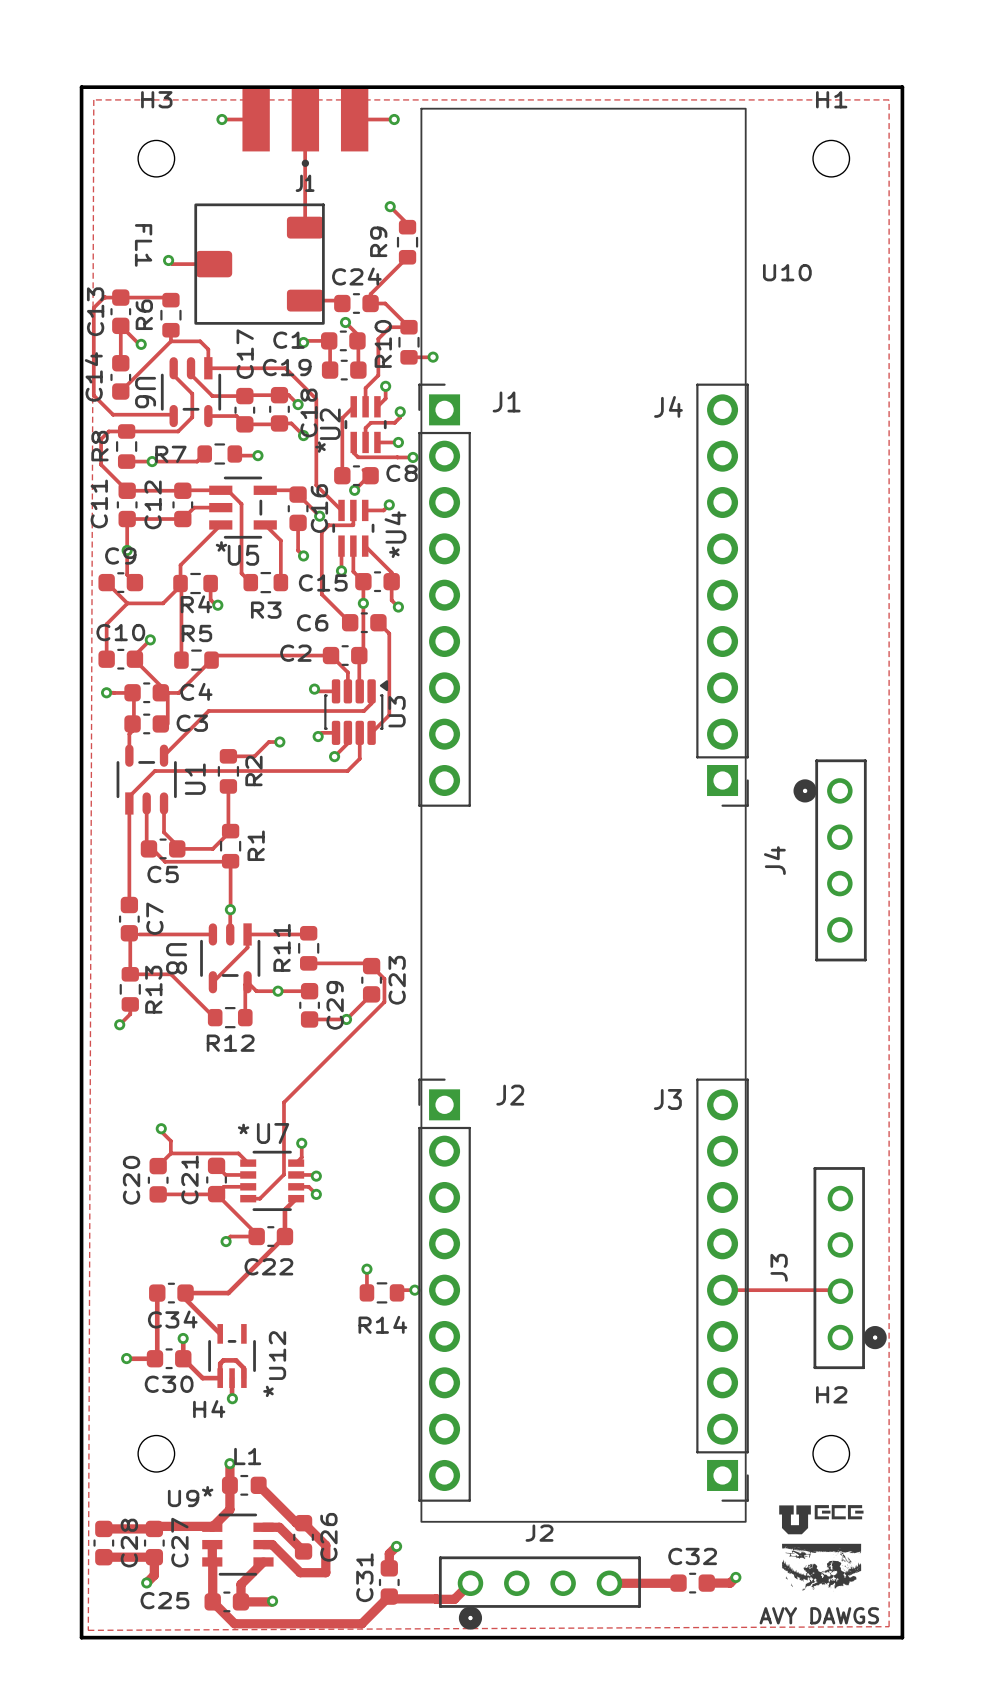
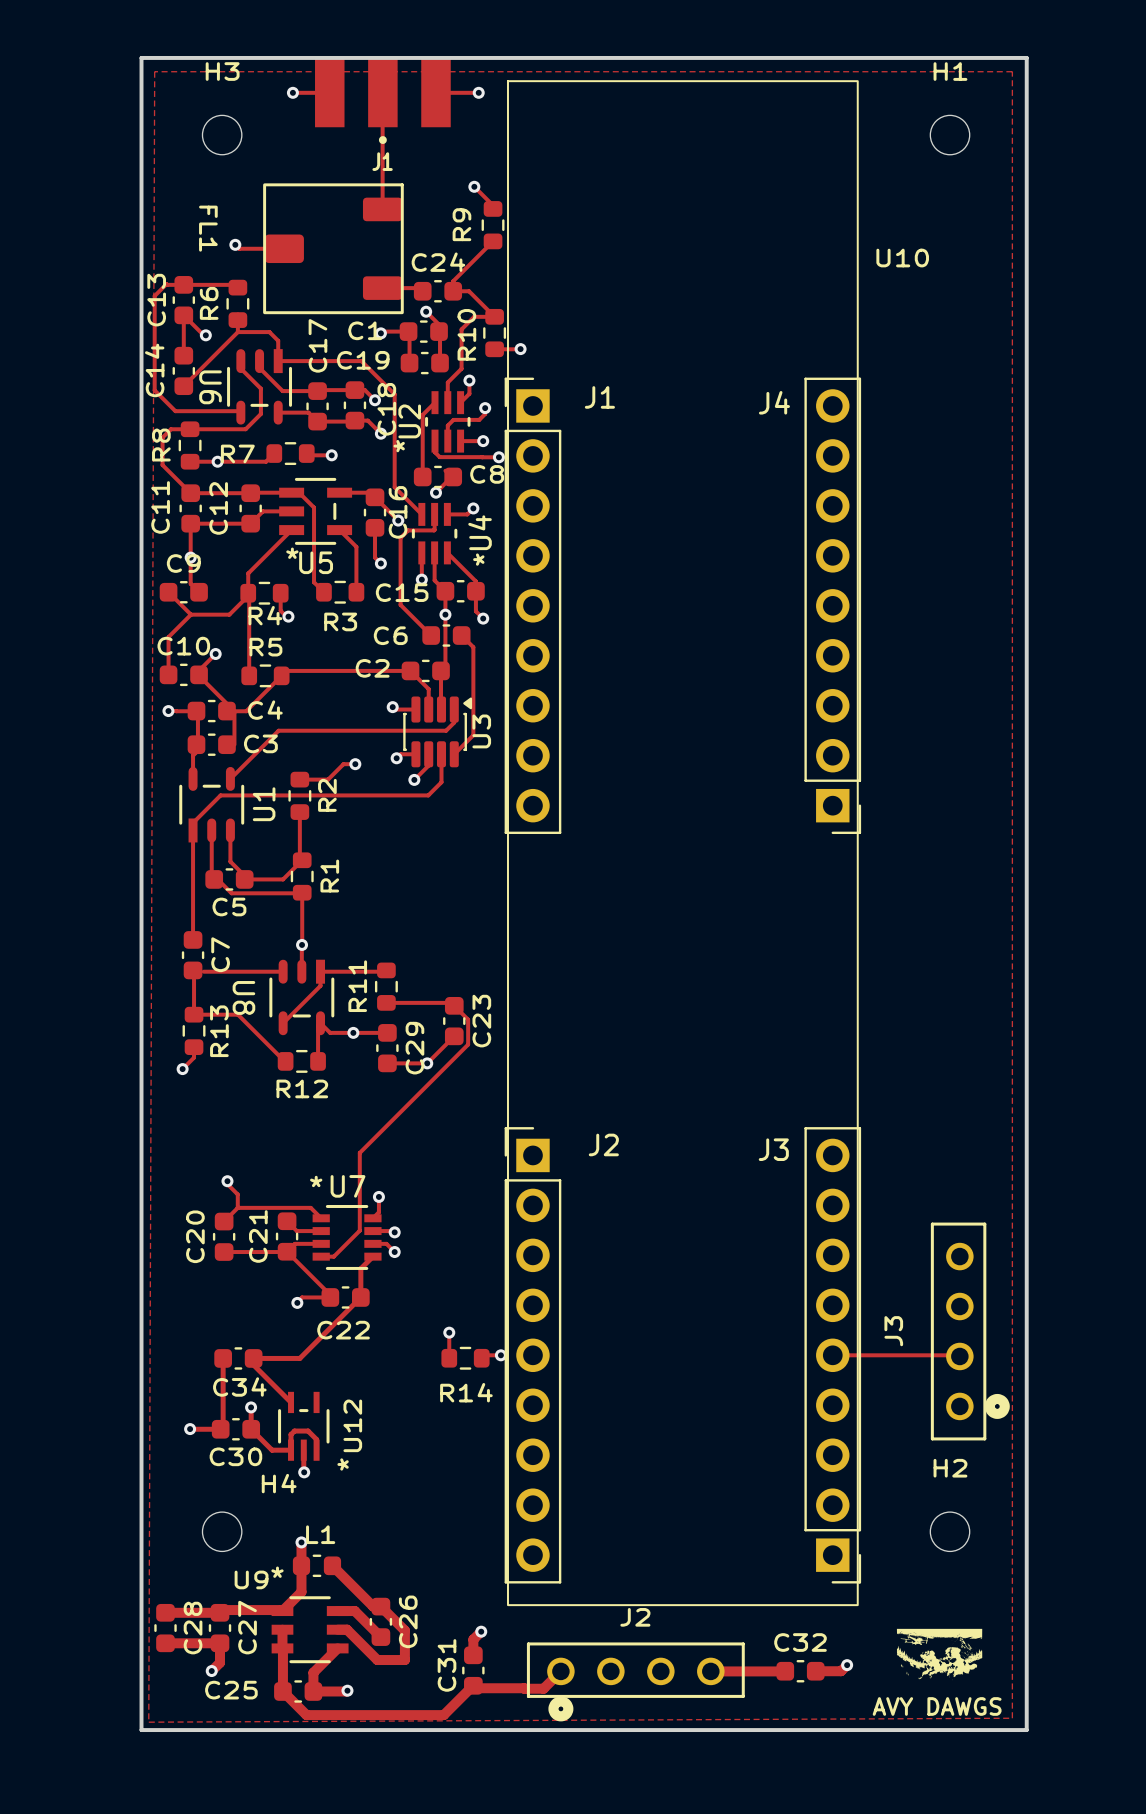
J4: (830, 860) -> none
drawing: [779, 1505, 864, 1535] -> none

